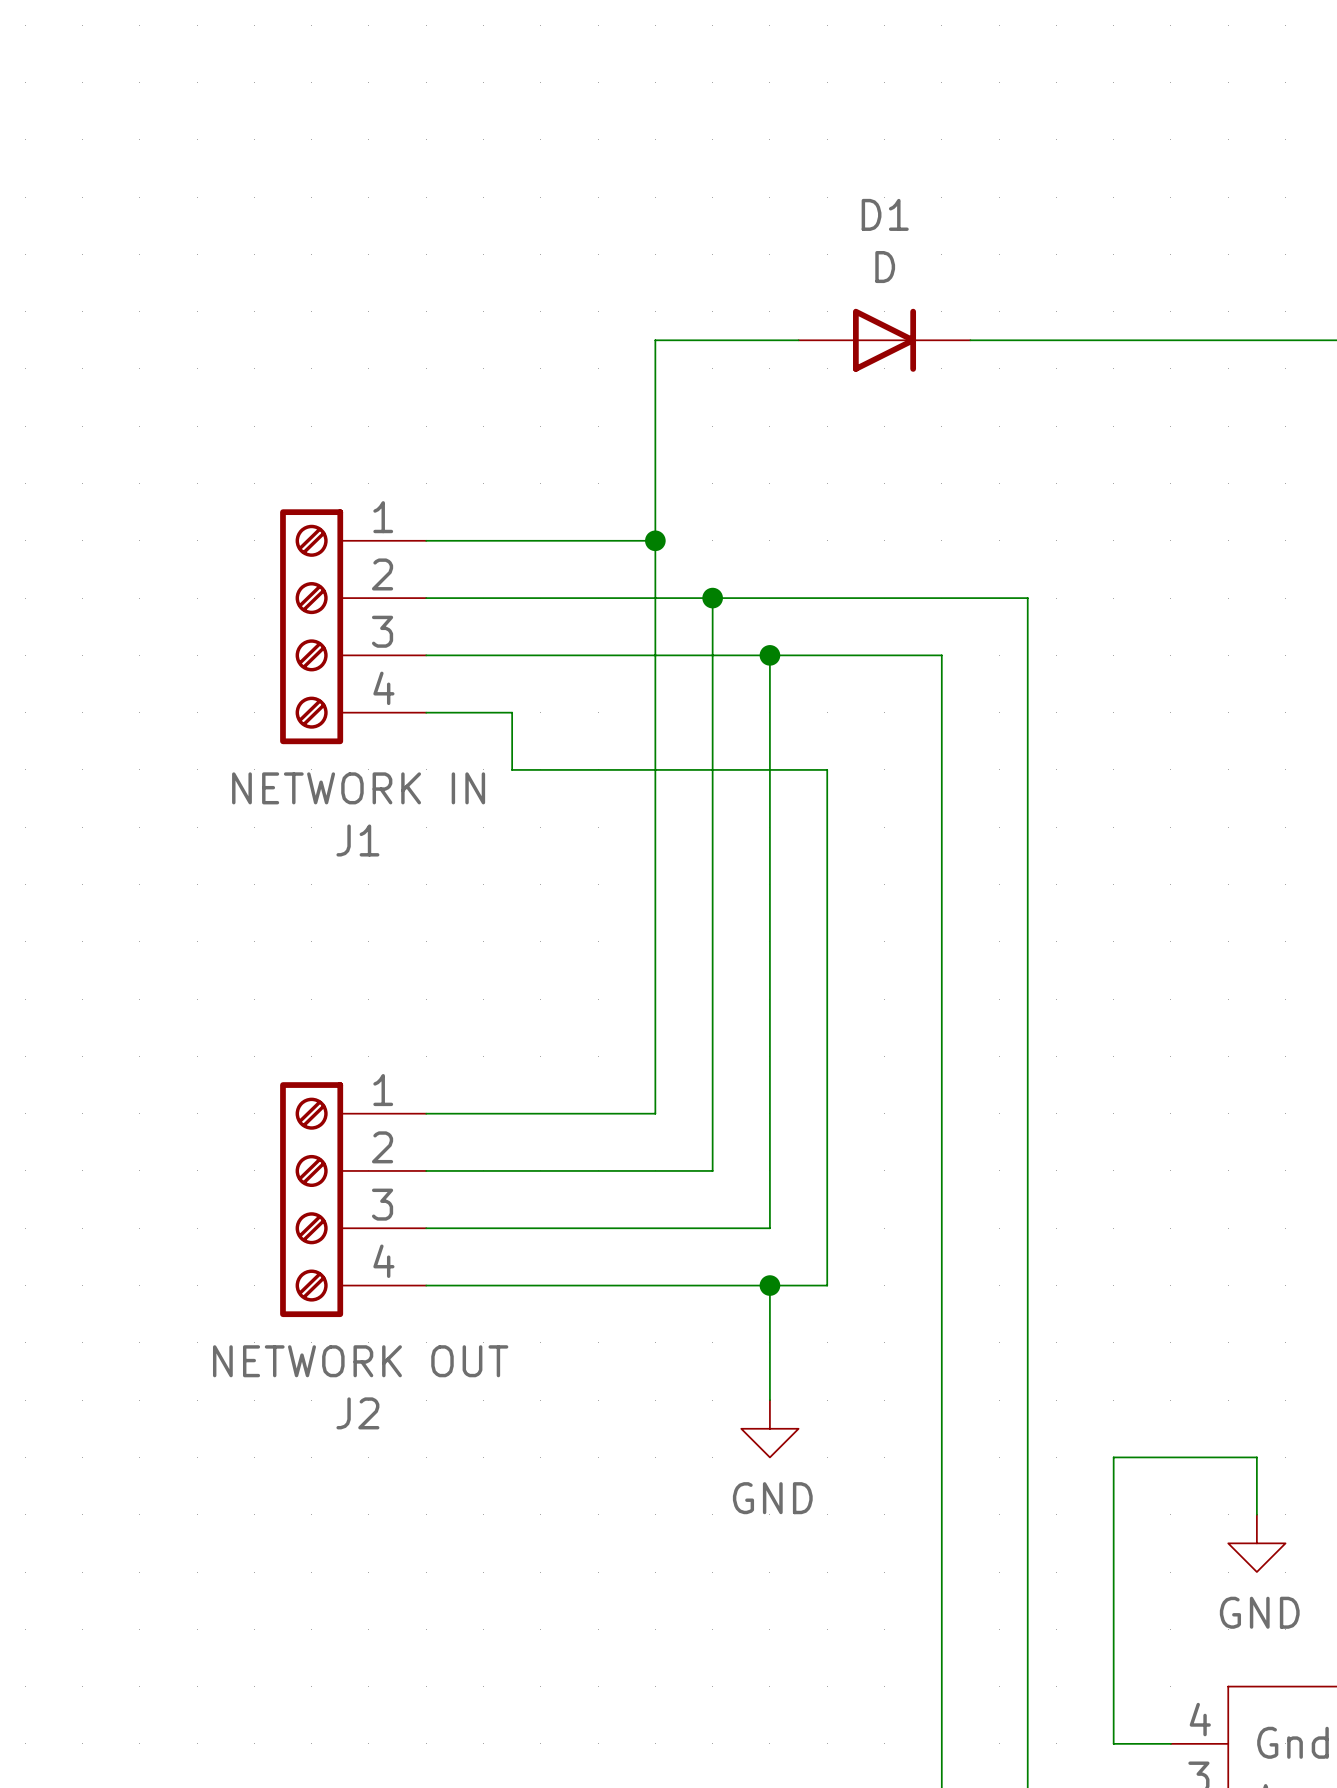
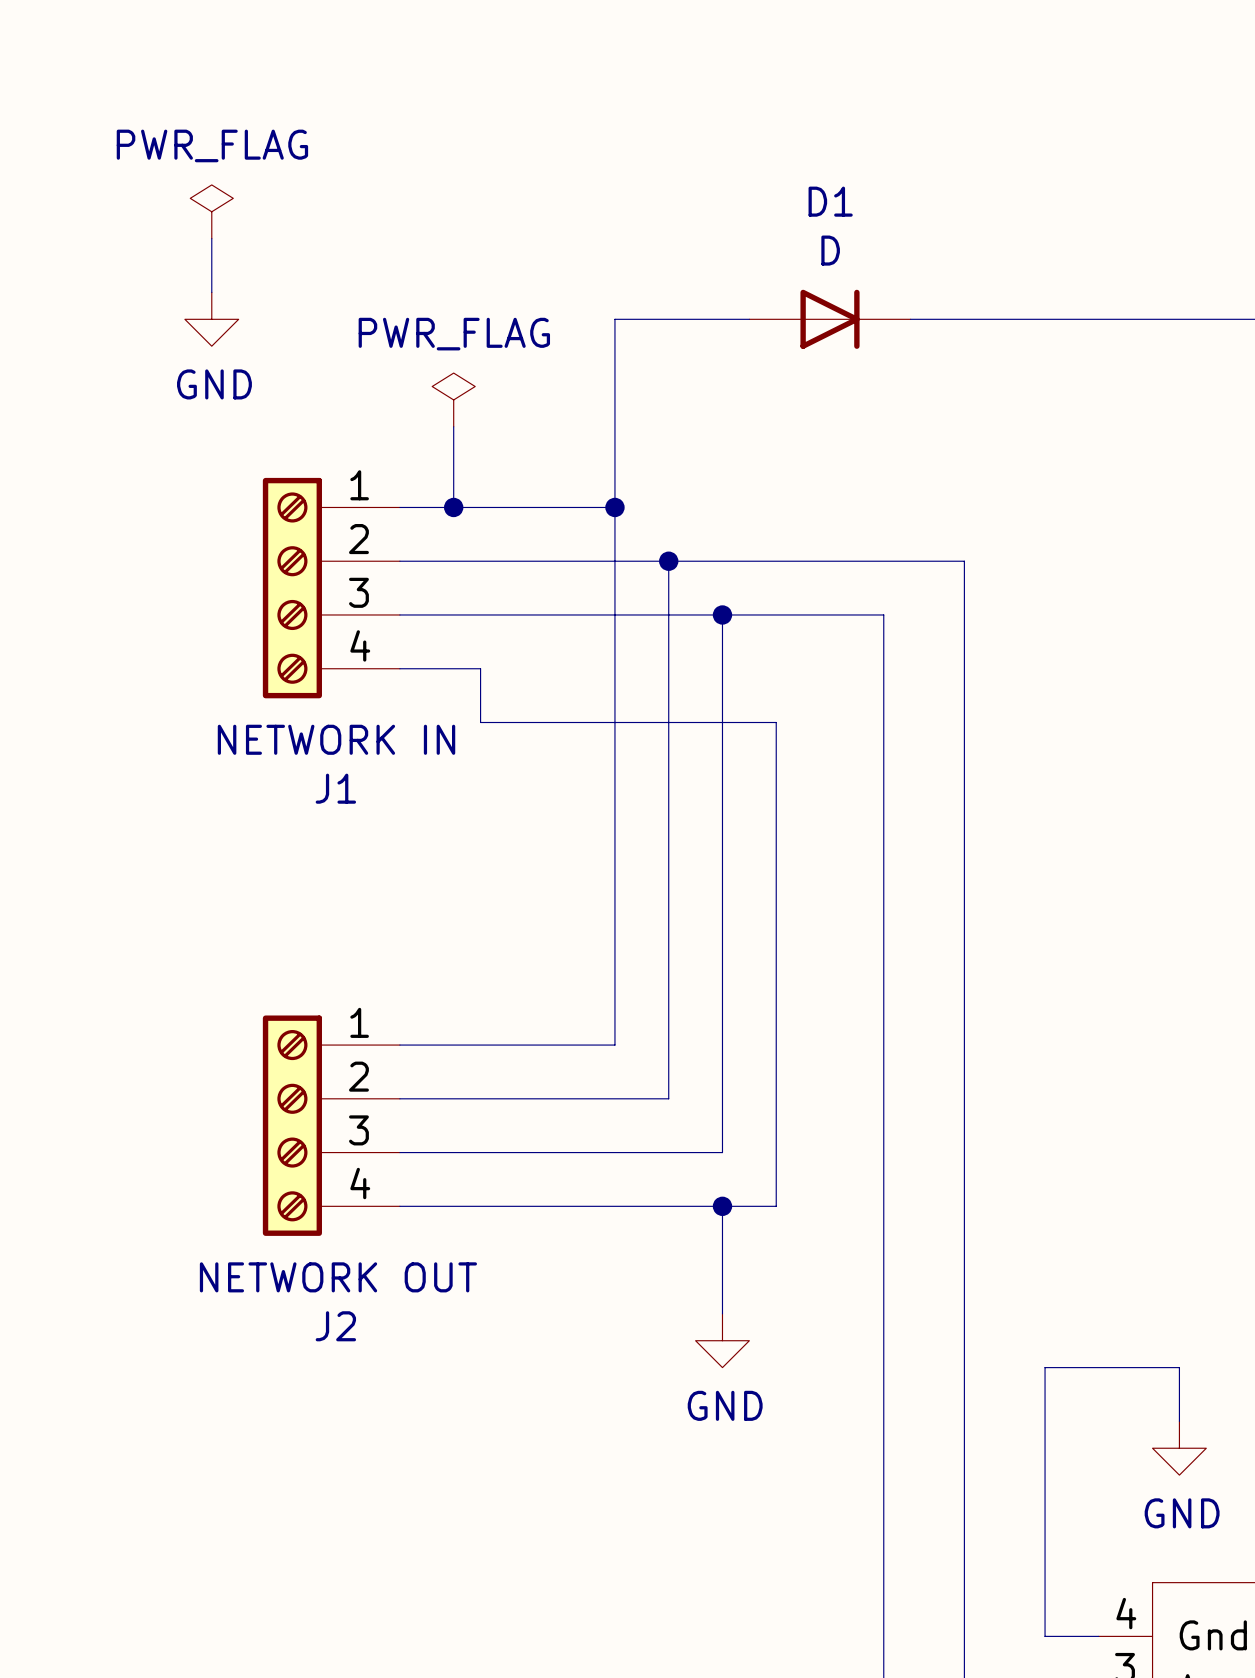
power symbol: none -> PWR_FLAG (211, 211)
wire: none -> (211, 238) (211, 292)
power symbol: none -> GND (211, 319)
power symbol: none -> PWR_FLAG (453, 399)
wire: none -> (453, 426) (453, 507)
junction: none -> (453, 507)

